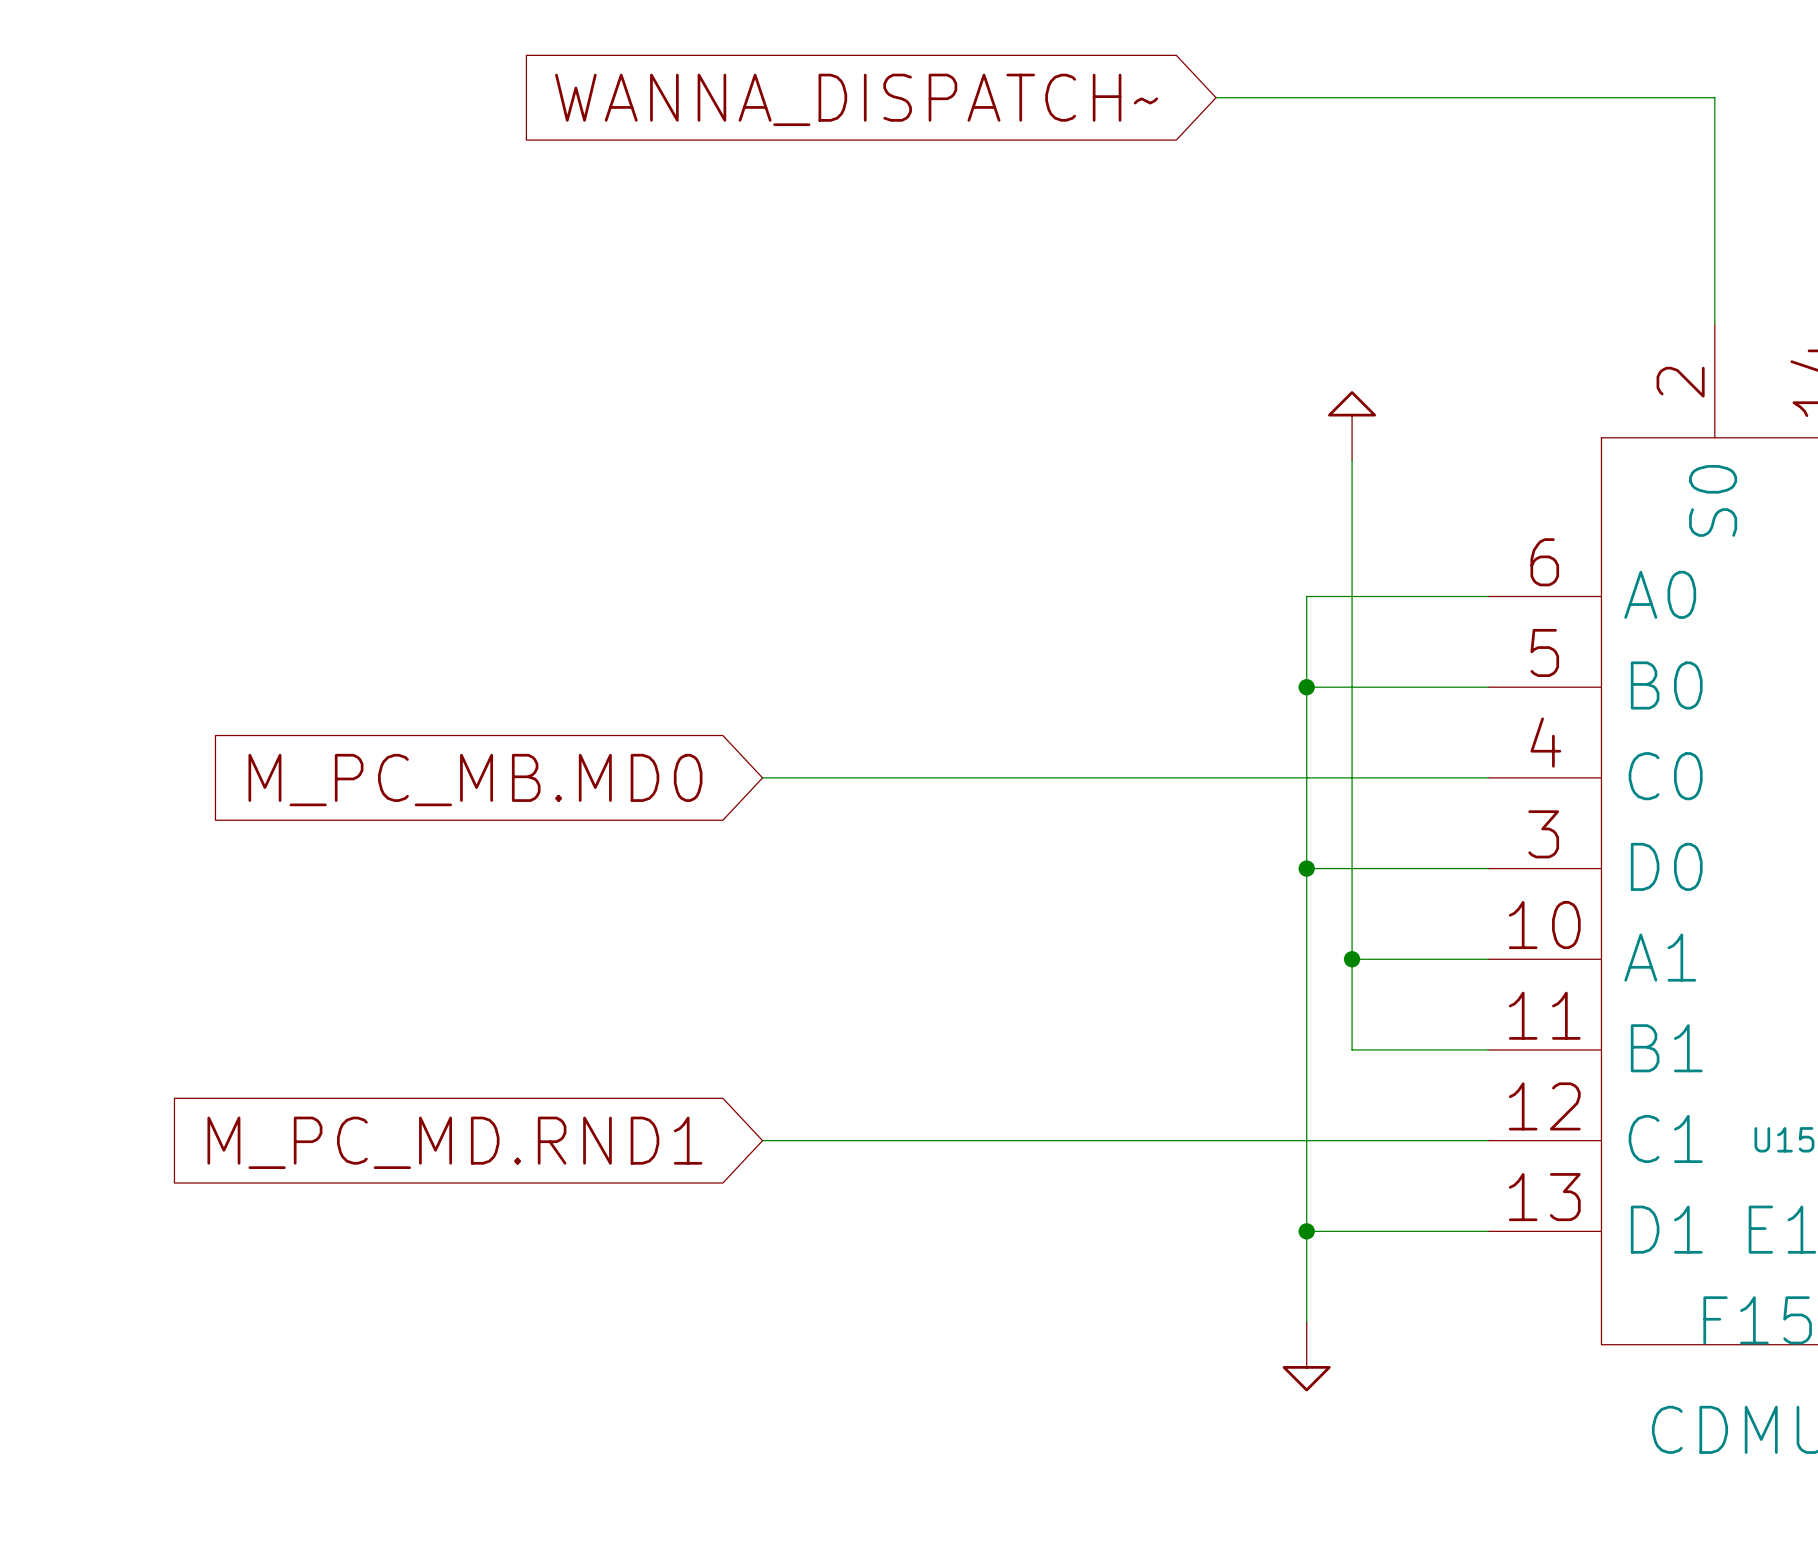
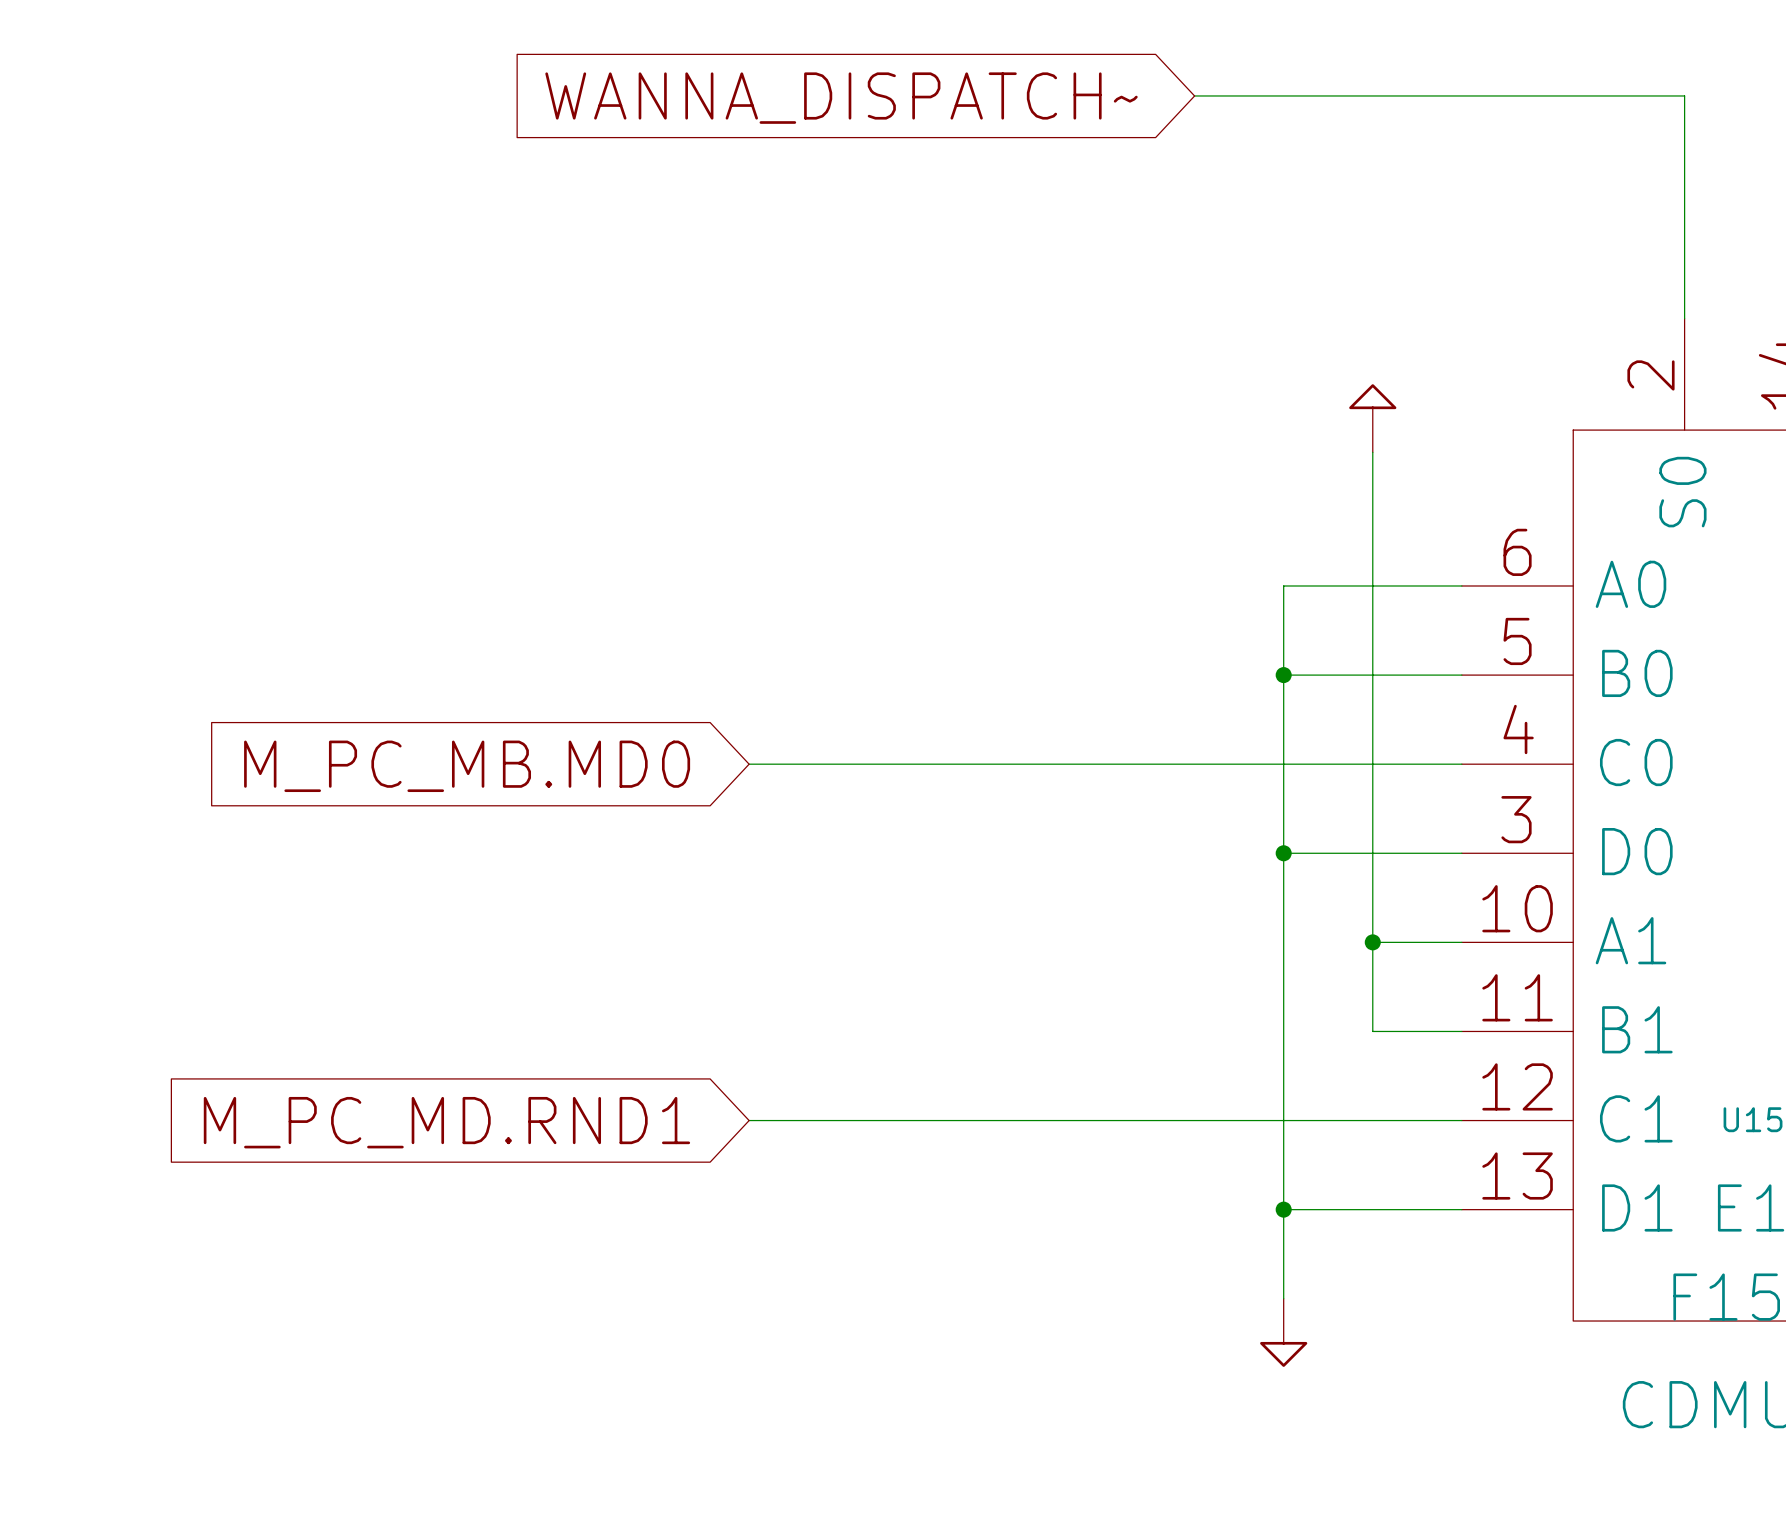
power symbol position: (1352, 425) -> (1372, 418)
wire: (1352, 460) (1352, 1049) (1397, 1049) -> (1372, 452) (1372, 1031)
wire: (1352, 959) (1397, 959) -> none
junction position: (1352, 959) -> (1372, 942)

